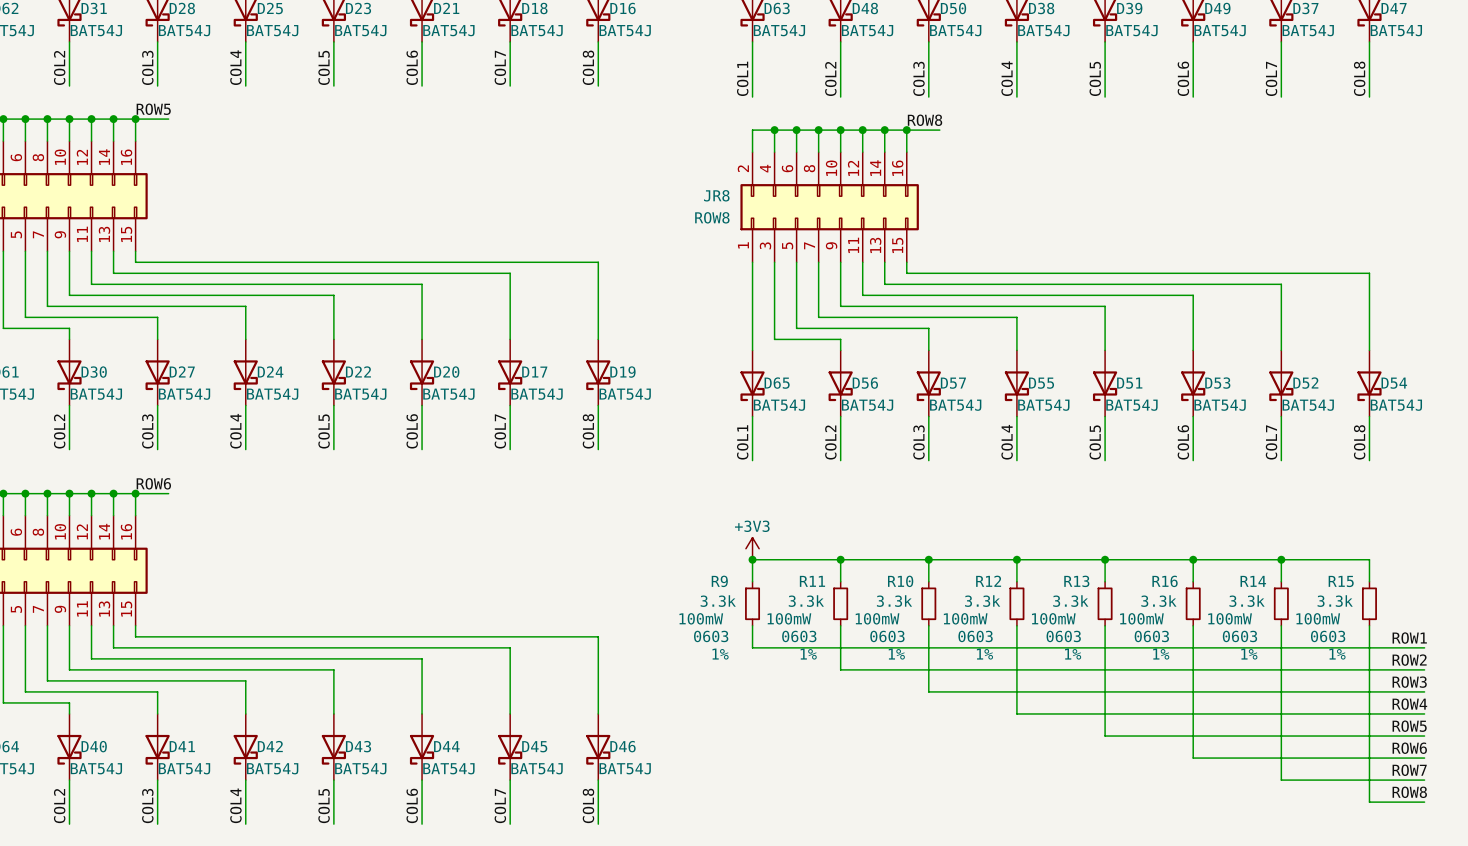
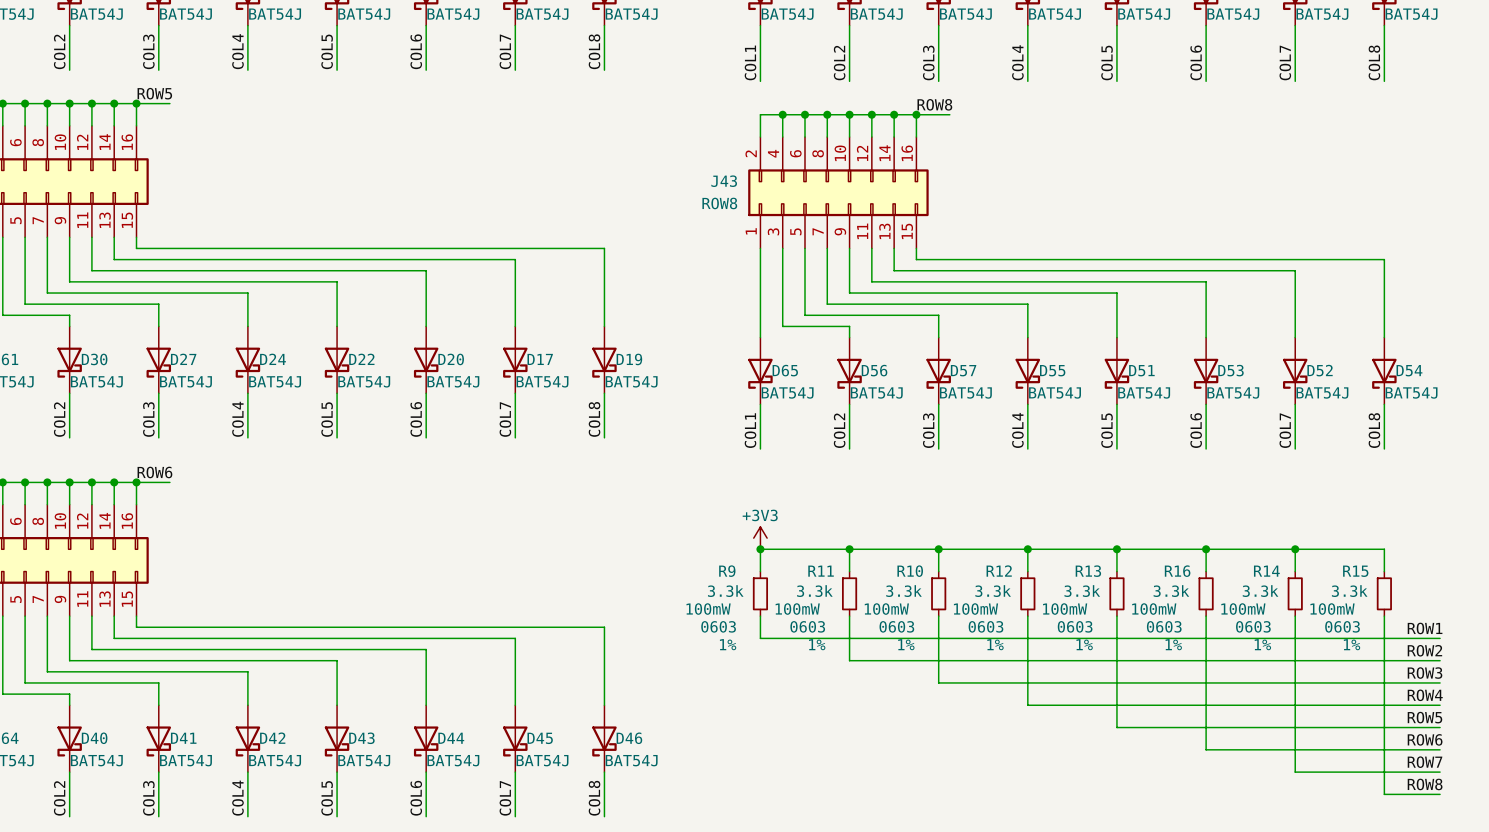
JR8 name: JR8 (716, 195) -> J43 (724, 181)

